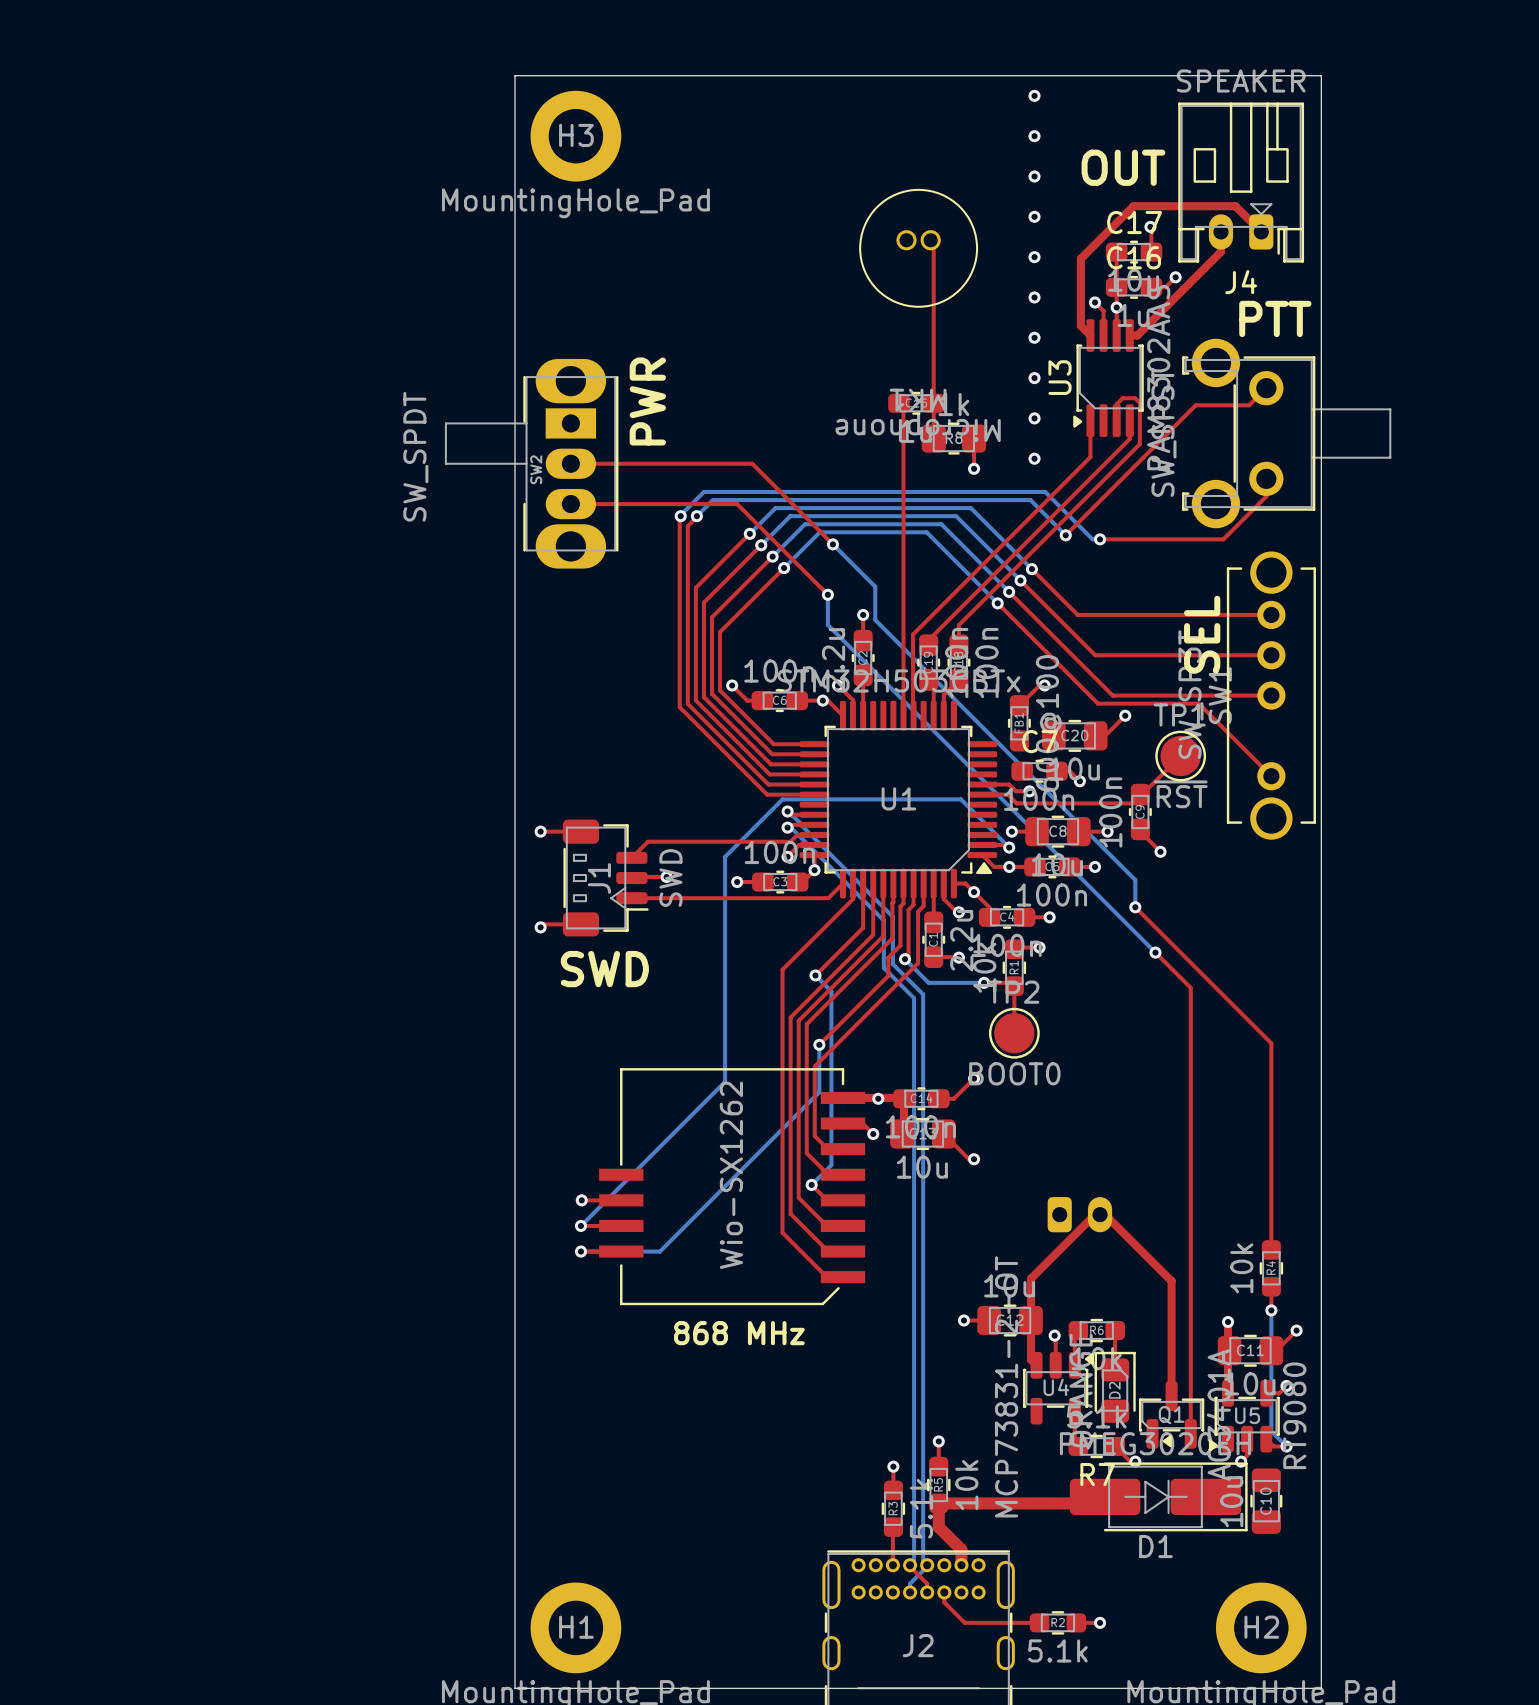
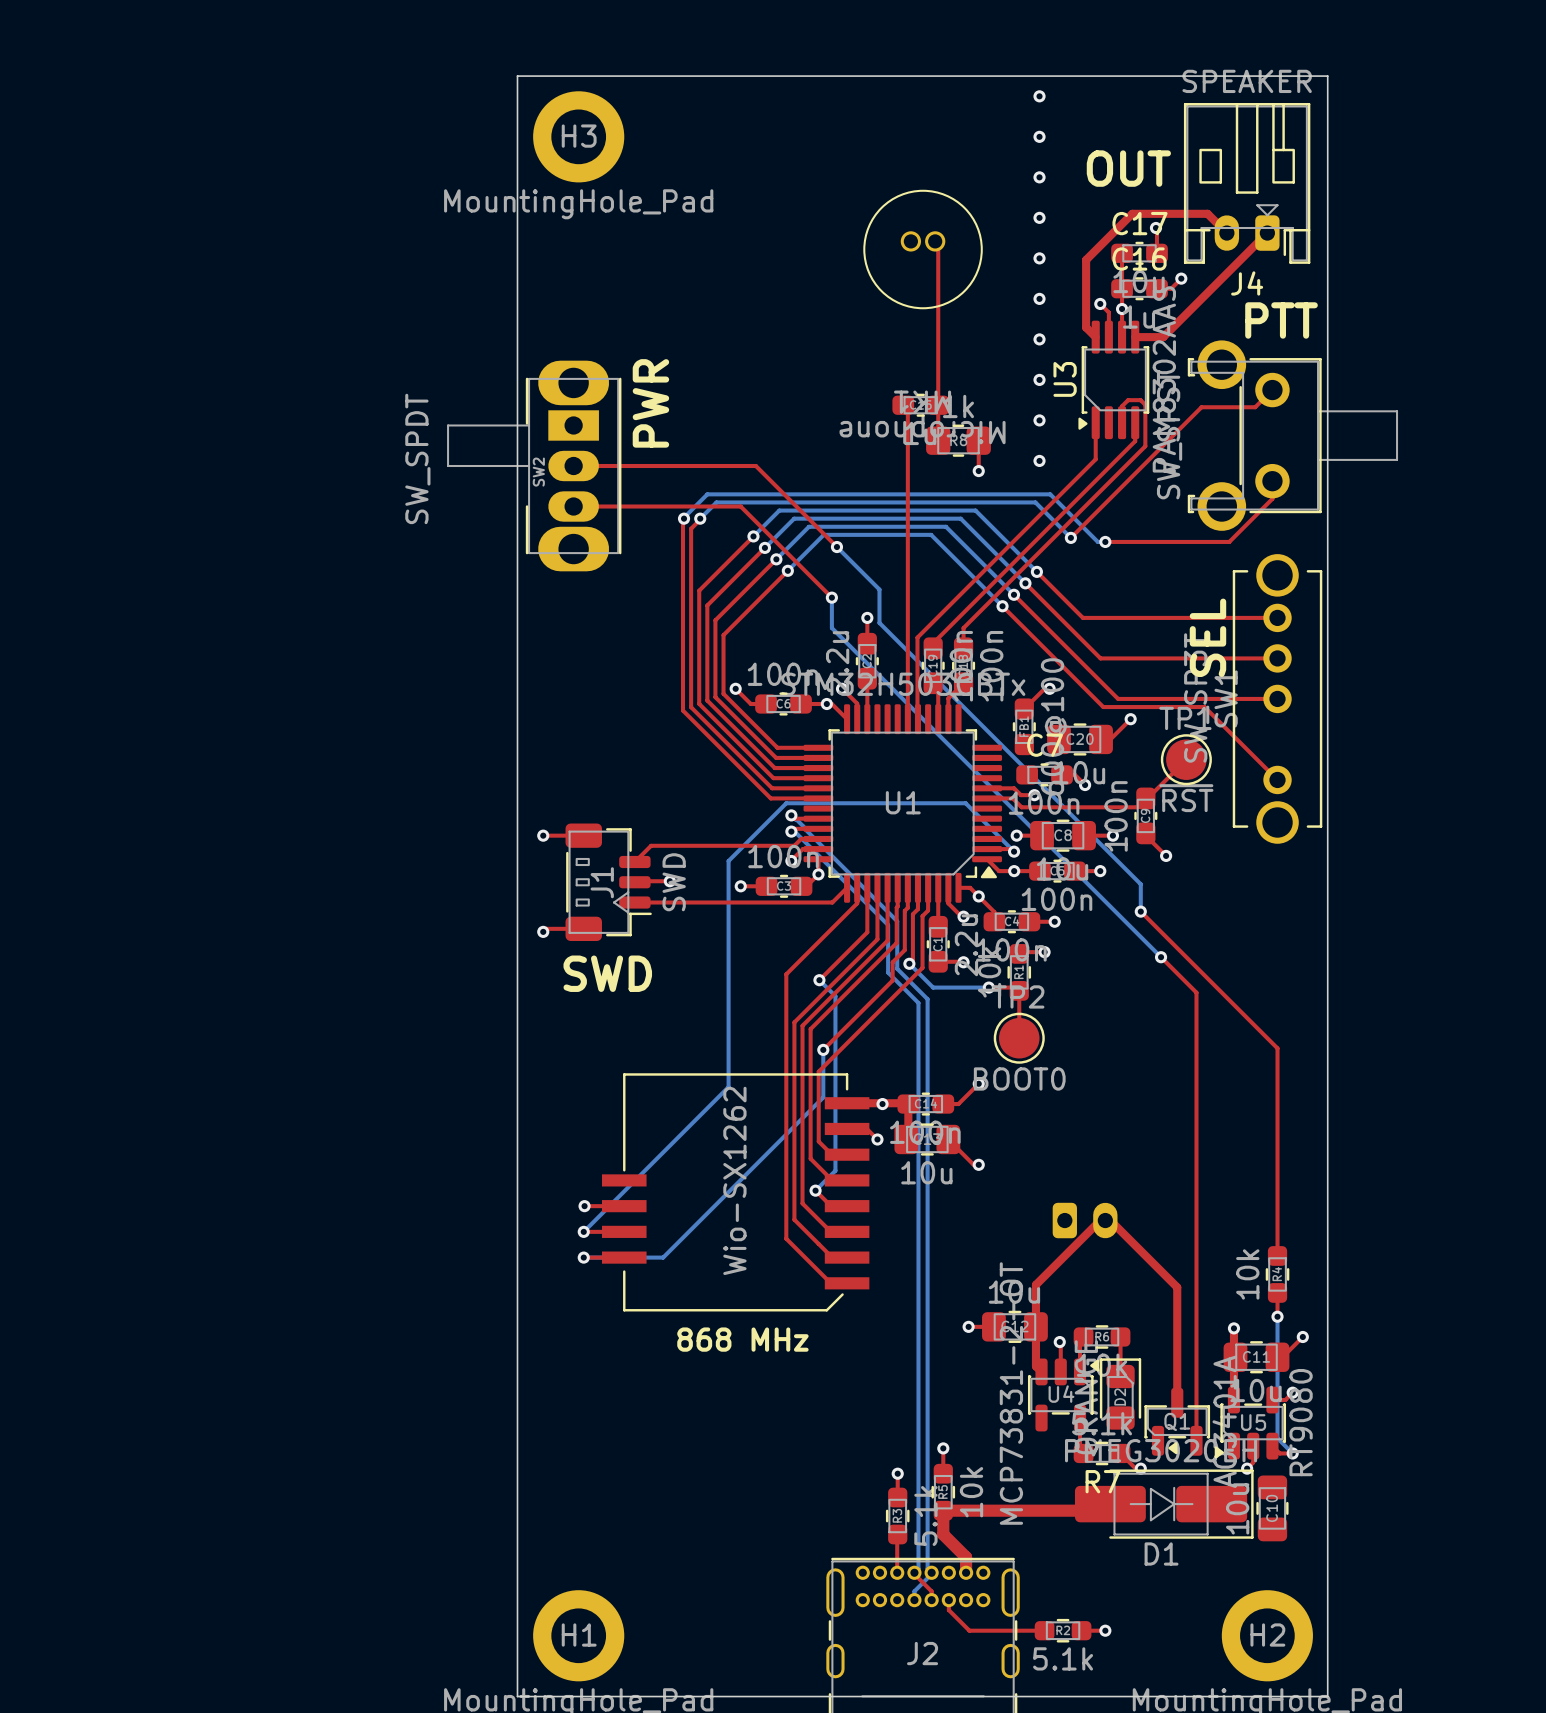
top track: (1126, 212) (1133, 206) (1235, 206) (1261, 231) -> (1132, 213) (1207, 213) (1226, 233)
top track: (1220, 231) (1220, 251) (1137, 335) -> (1267, 233) (1163, 337) (1142, 337)

